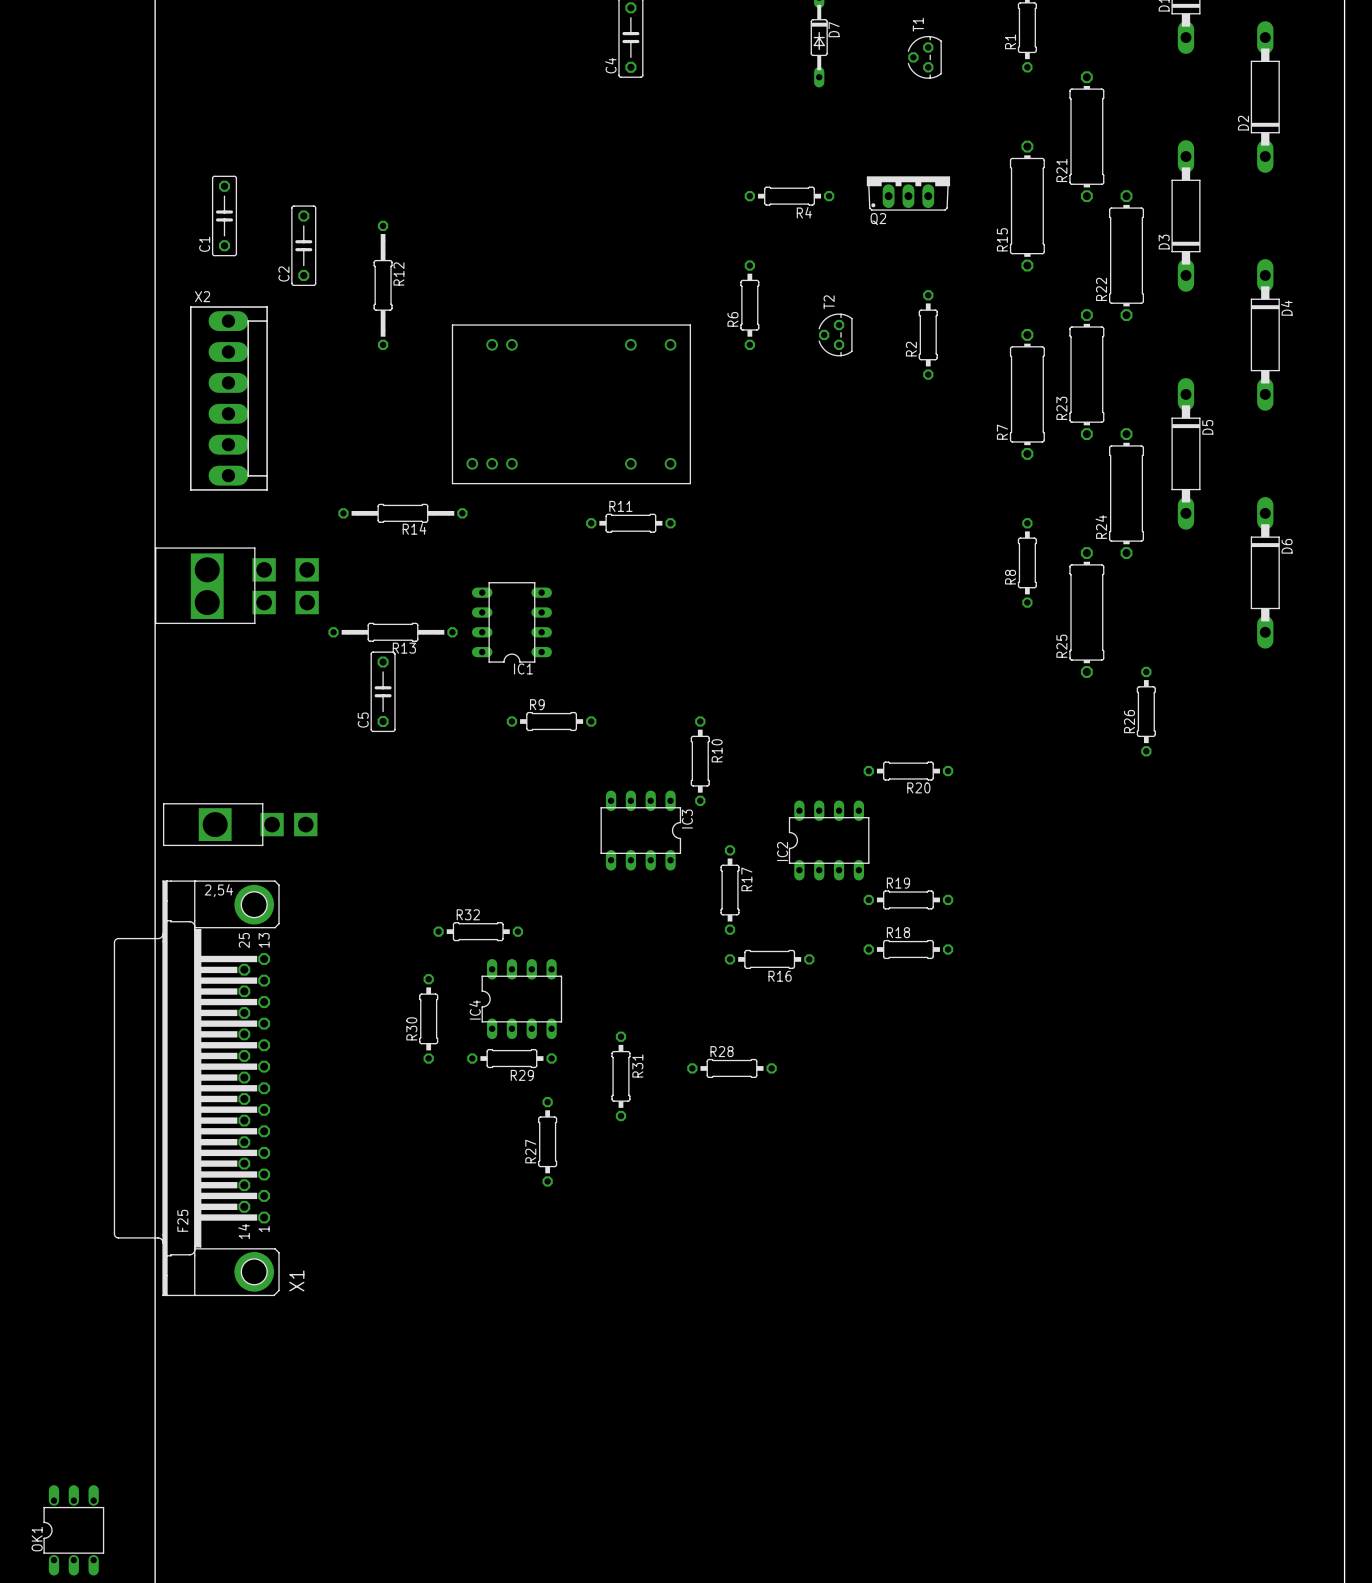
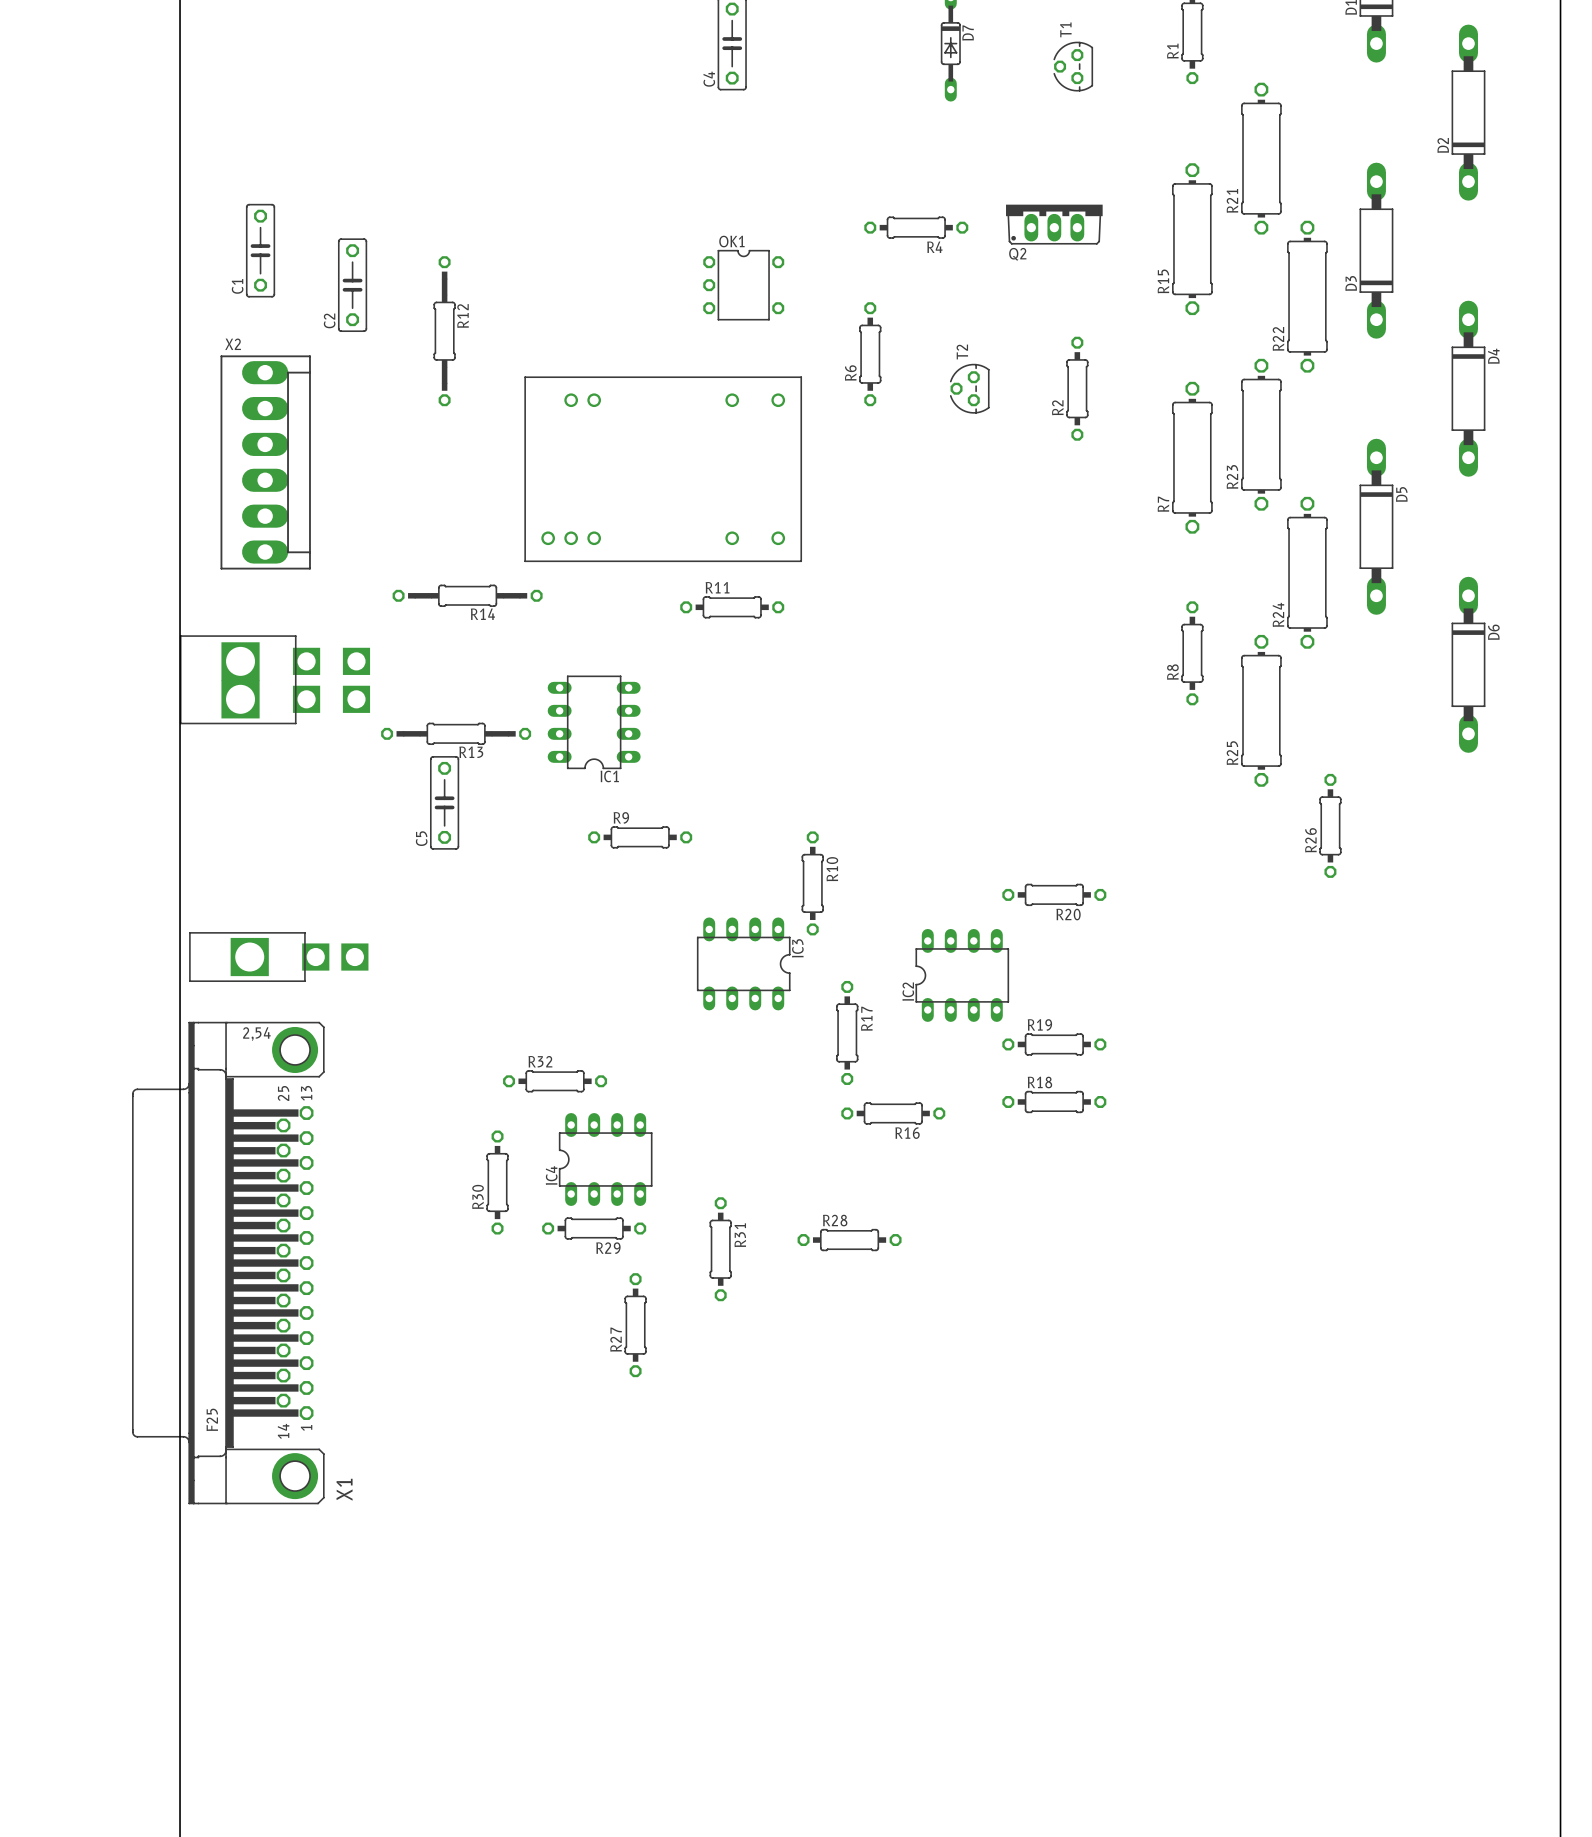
OK1 footprint: [43, 1485, 105, 1576] -> [703, 249, 785, 321]
OK1 name position: OK1 (37, 1539) -> OK1 (731, 241)

